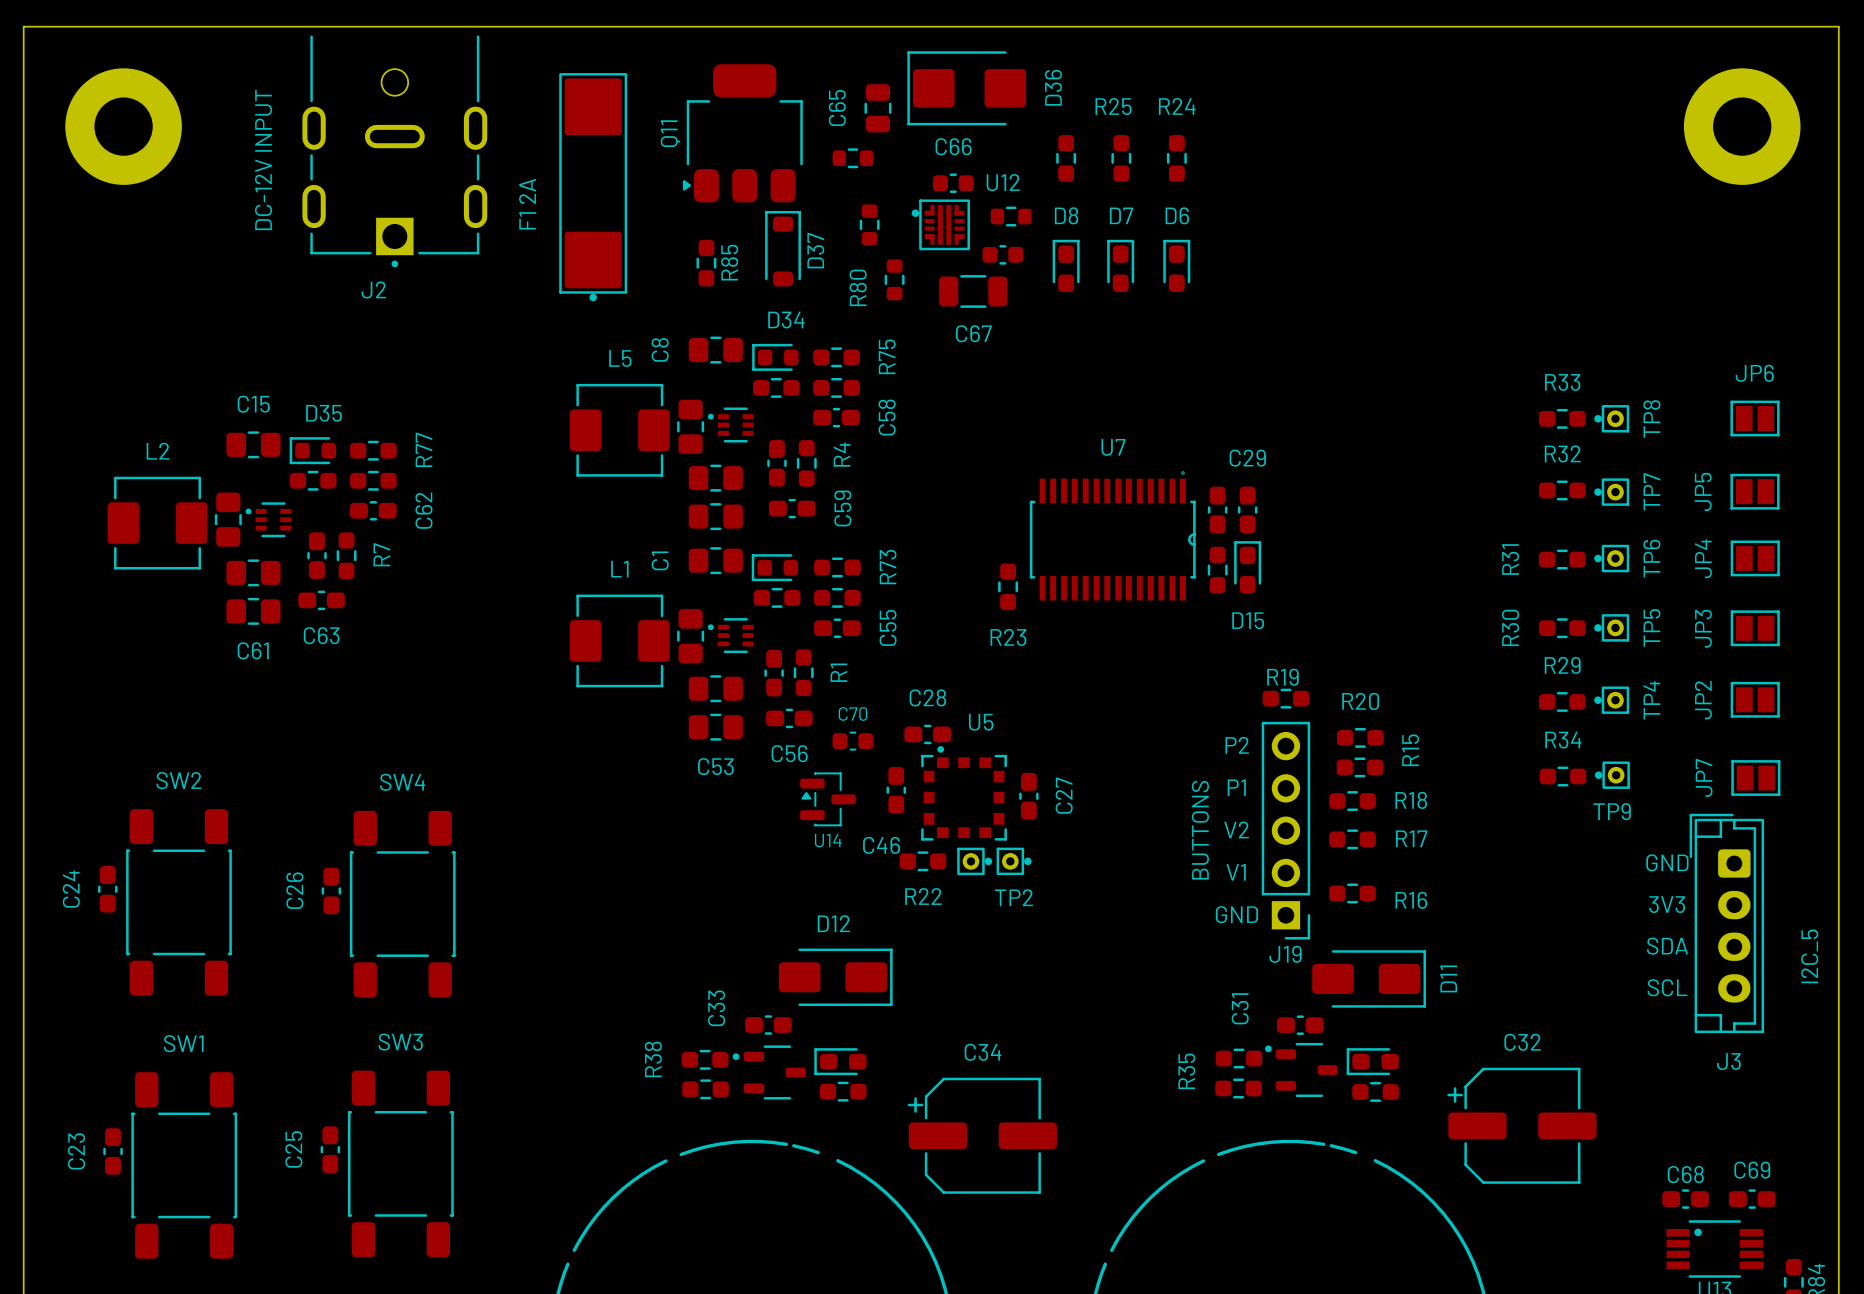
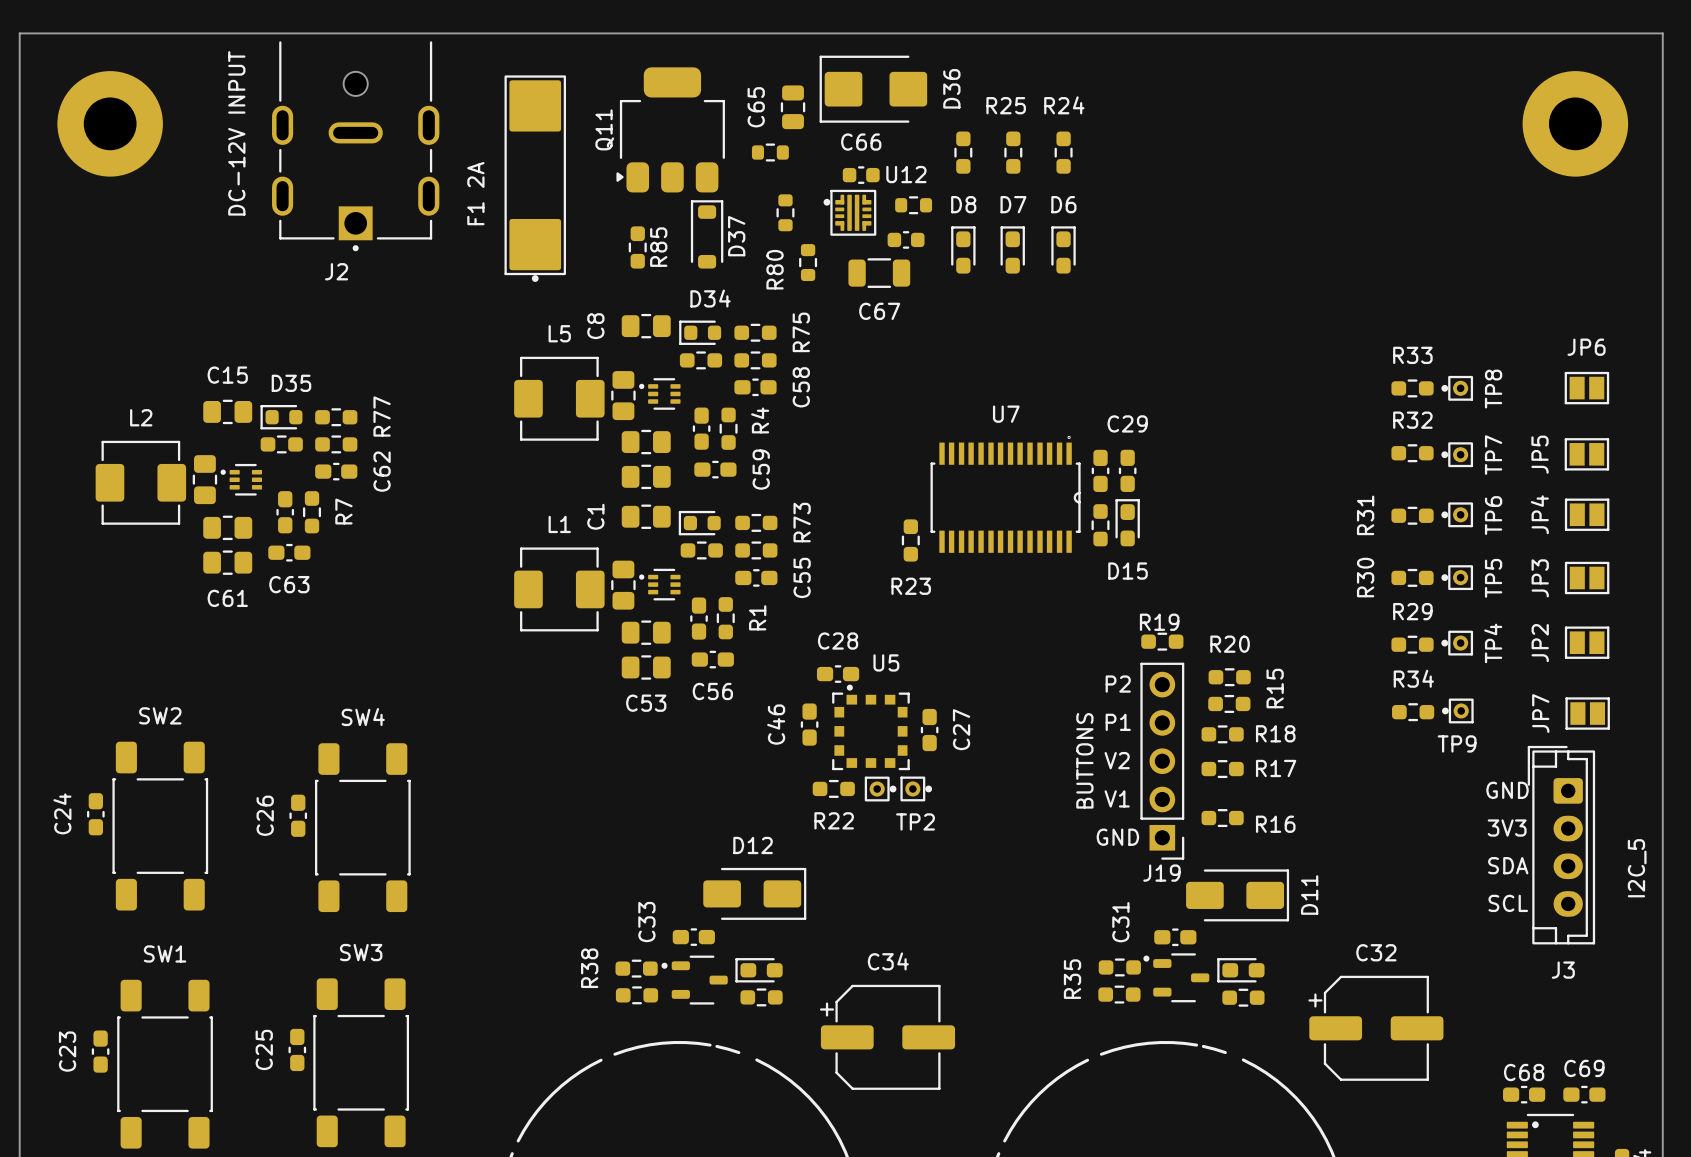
C70: (852, 741) -> none
U14: (828, 799) -> none
text rotation: 0° (881, 845) -> 90° counterclockwise (776, 724)
text position: C46 (881, 845) -> C46 (776, 724)

